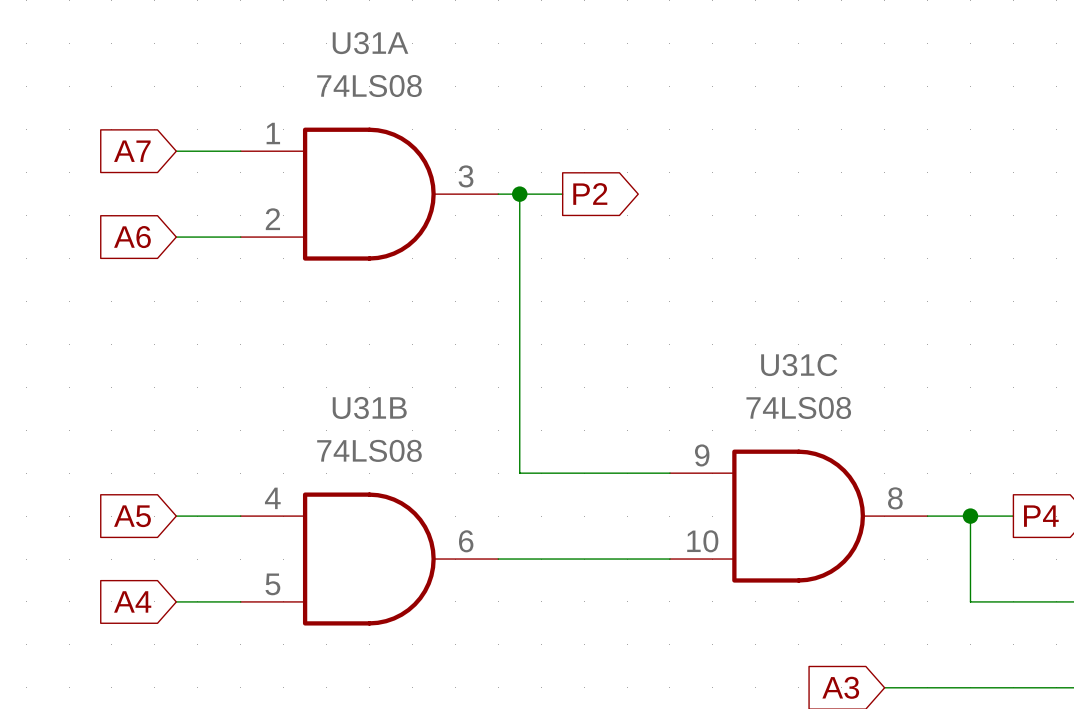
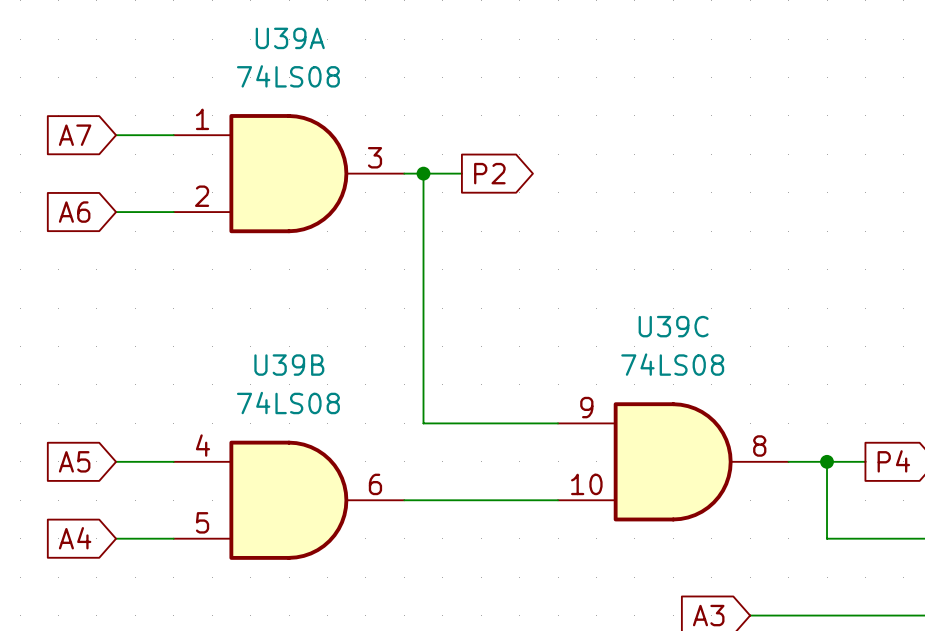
U31A name: U31A (370, 43) -> U39A (290, 38)
U31C name: U31C (799, 365) -> U39C (673, 326)
U31B name: U31B (369, 407) -> U39B (289, 365)

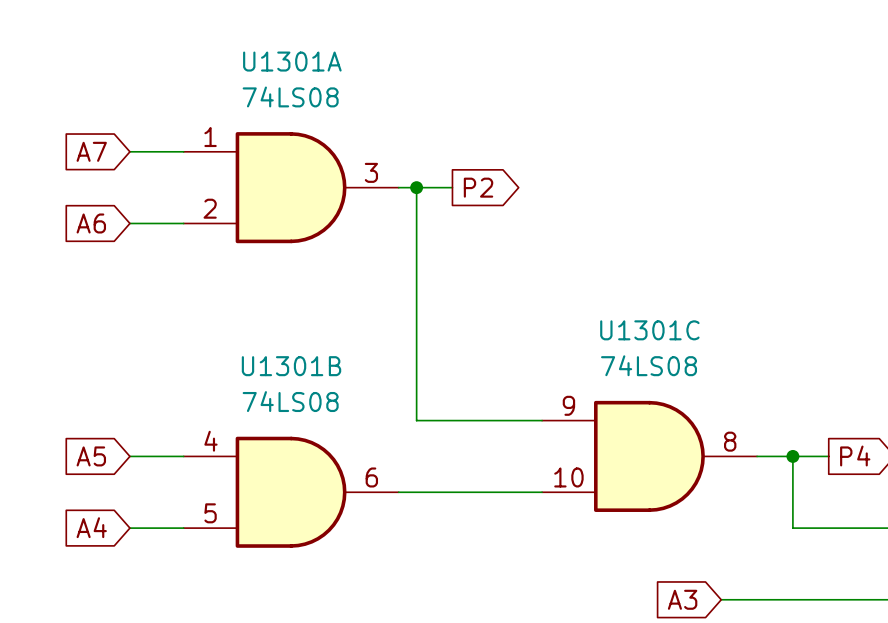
U39A name: U39A (290, 38) -> U1301A (292, 61)
U39C name: U39C (673, 326) -> U1301C (649, 330)
U39B name: U39B (289, 365) -> U1301B (291, 366)

